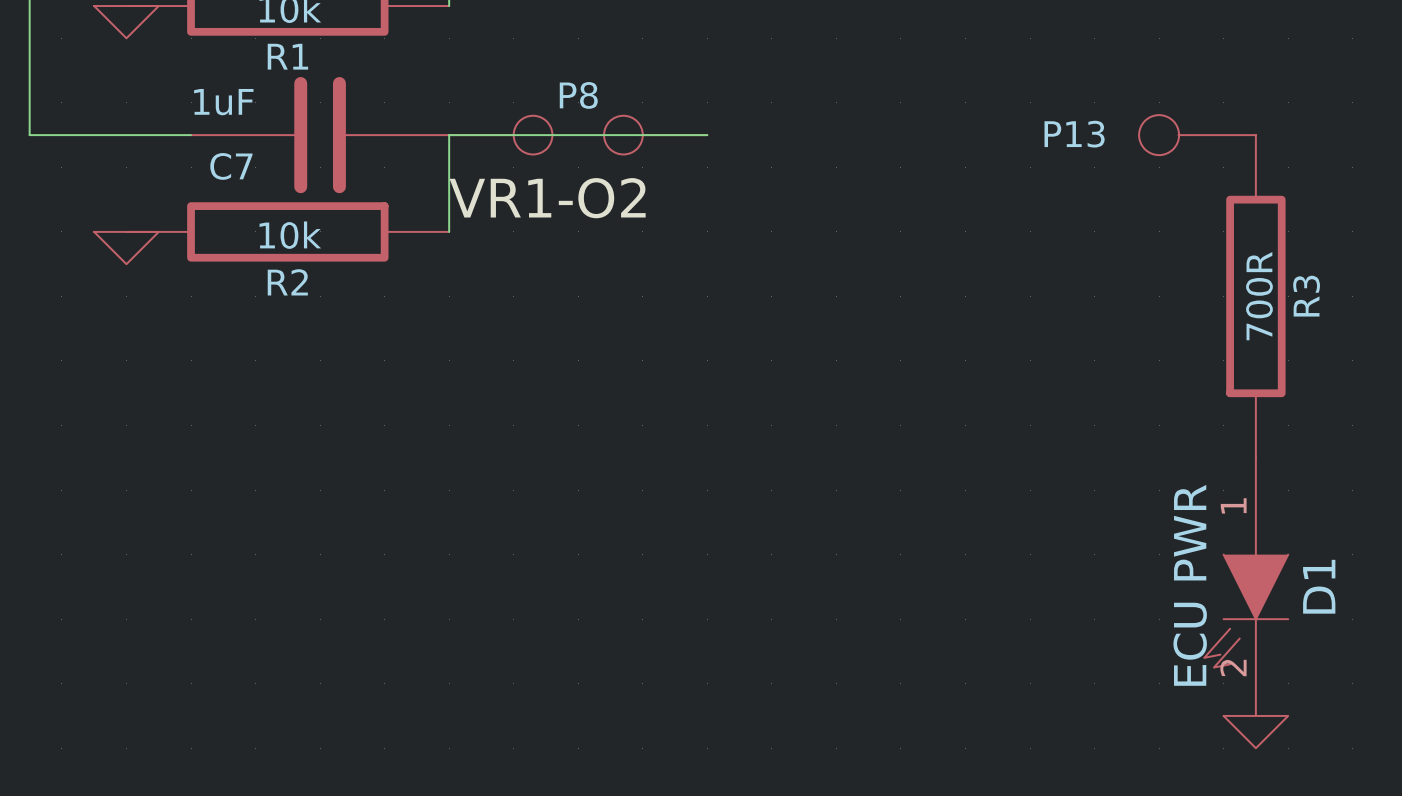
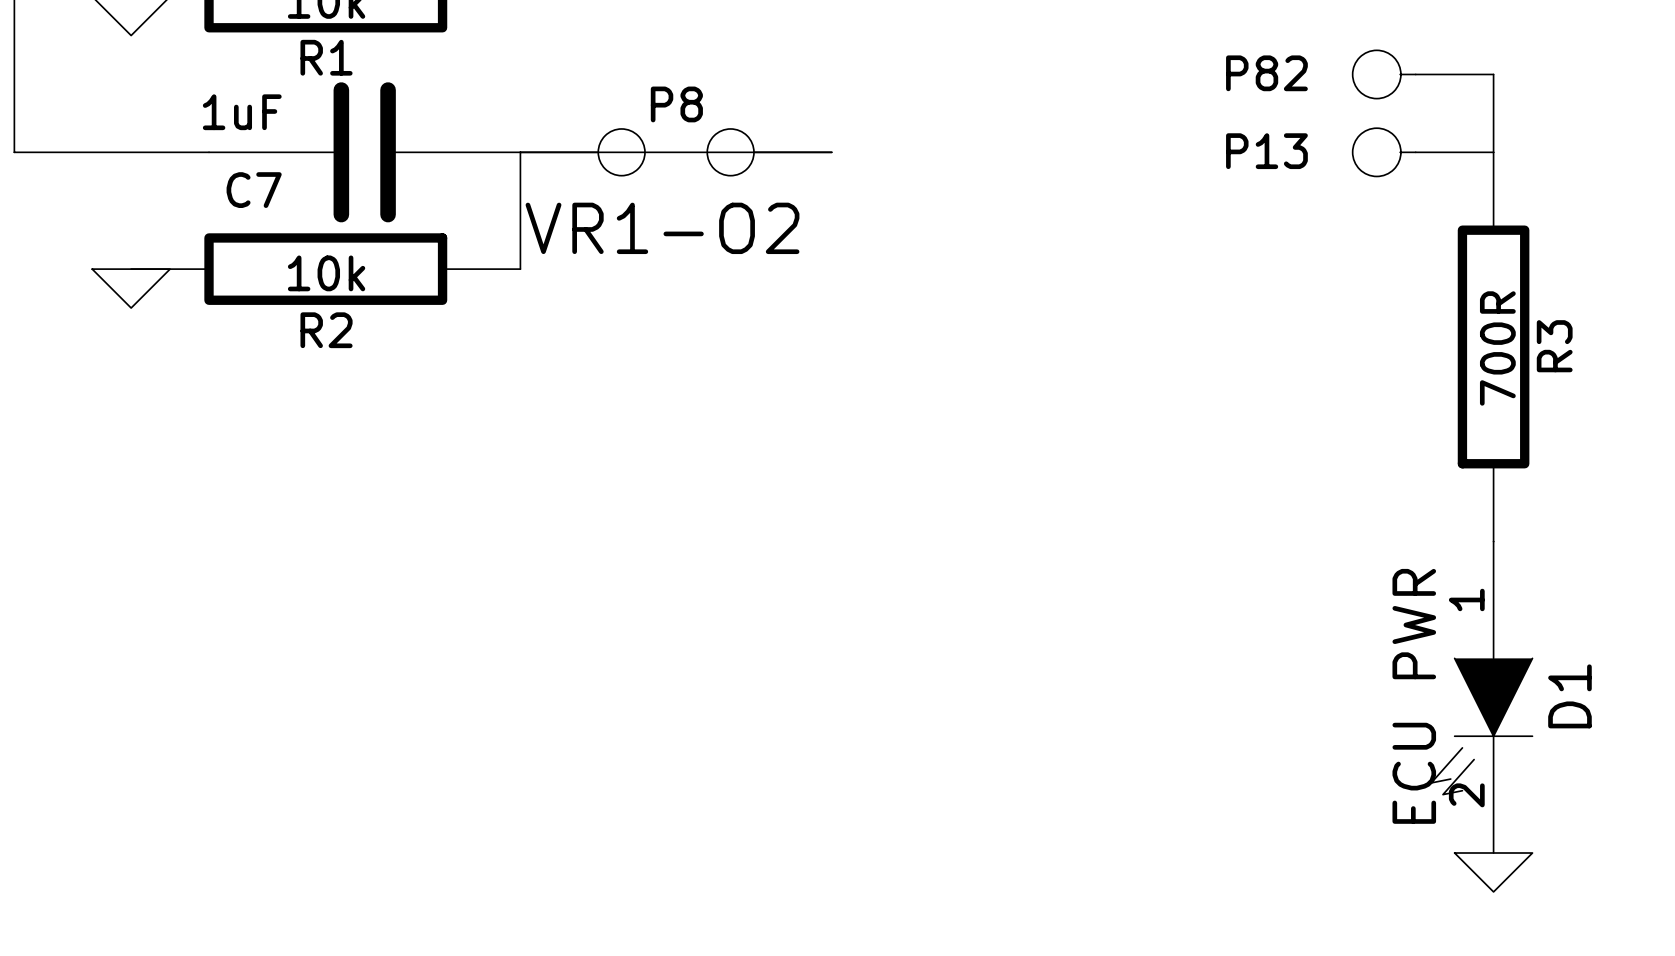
P82: none -> (1423, 74)
wire: none -> (1493, 74) (1493, 152)

